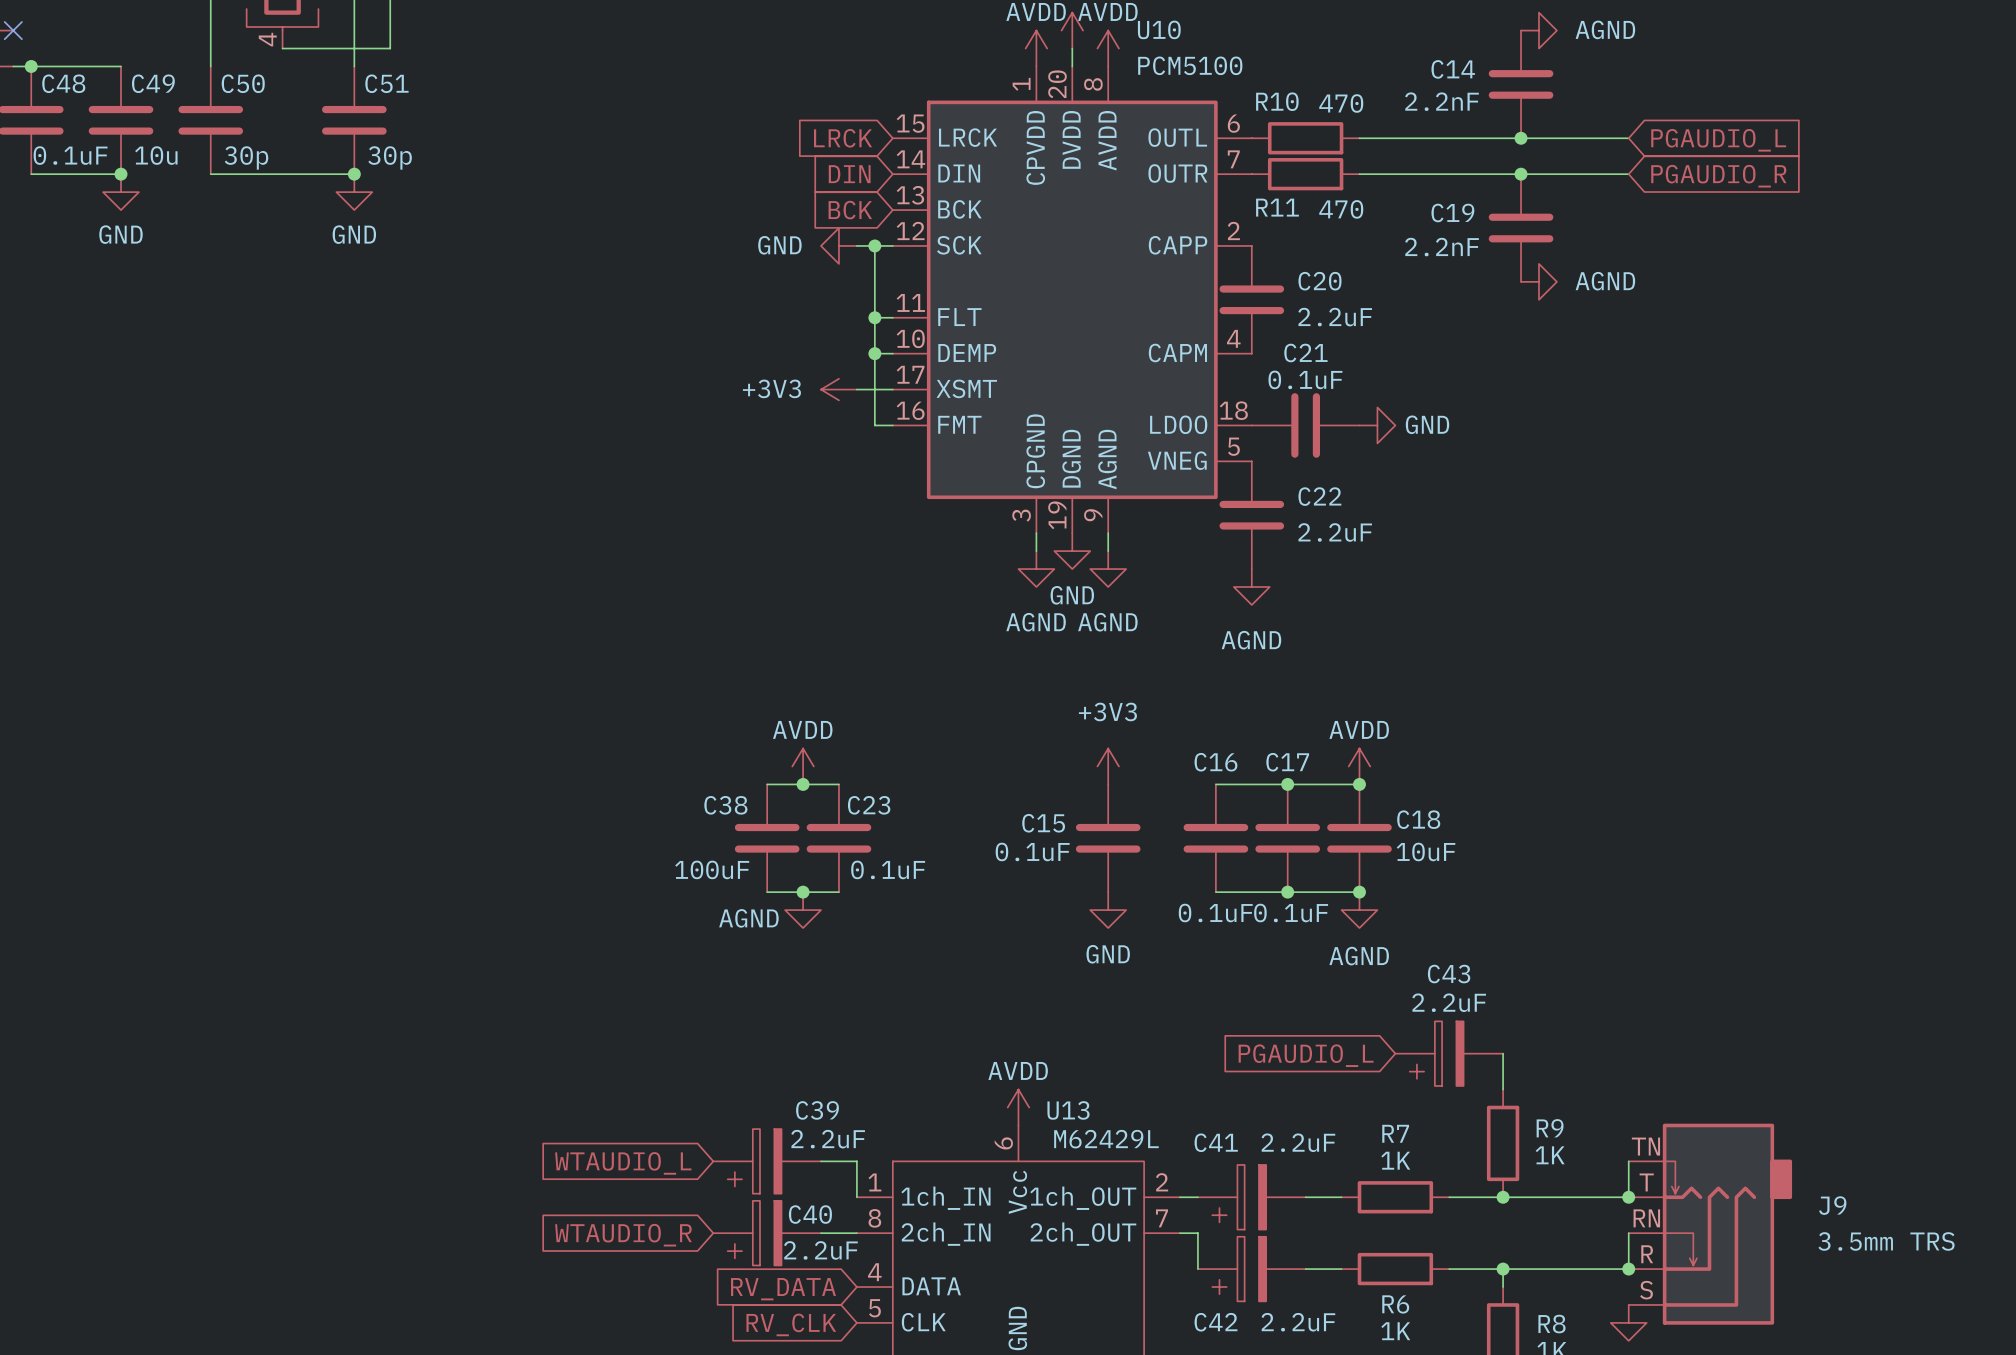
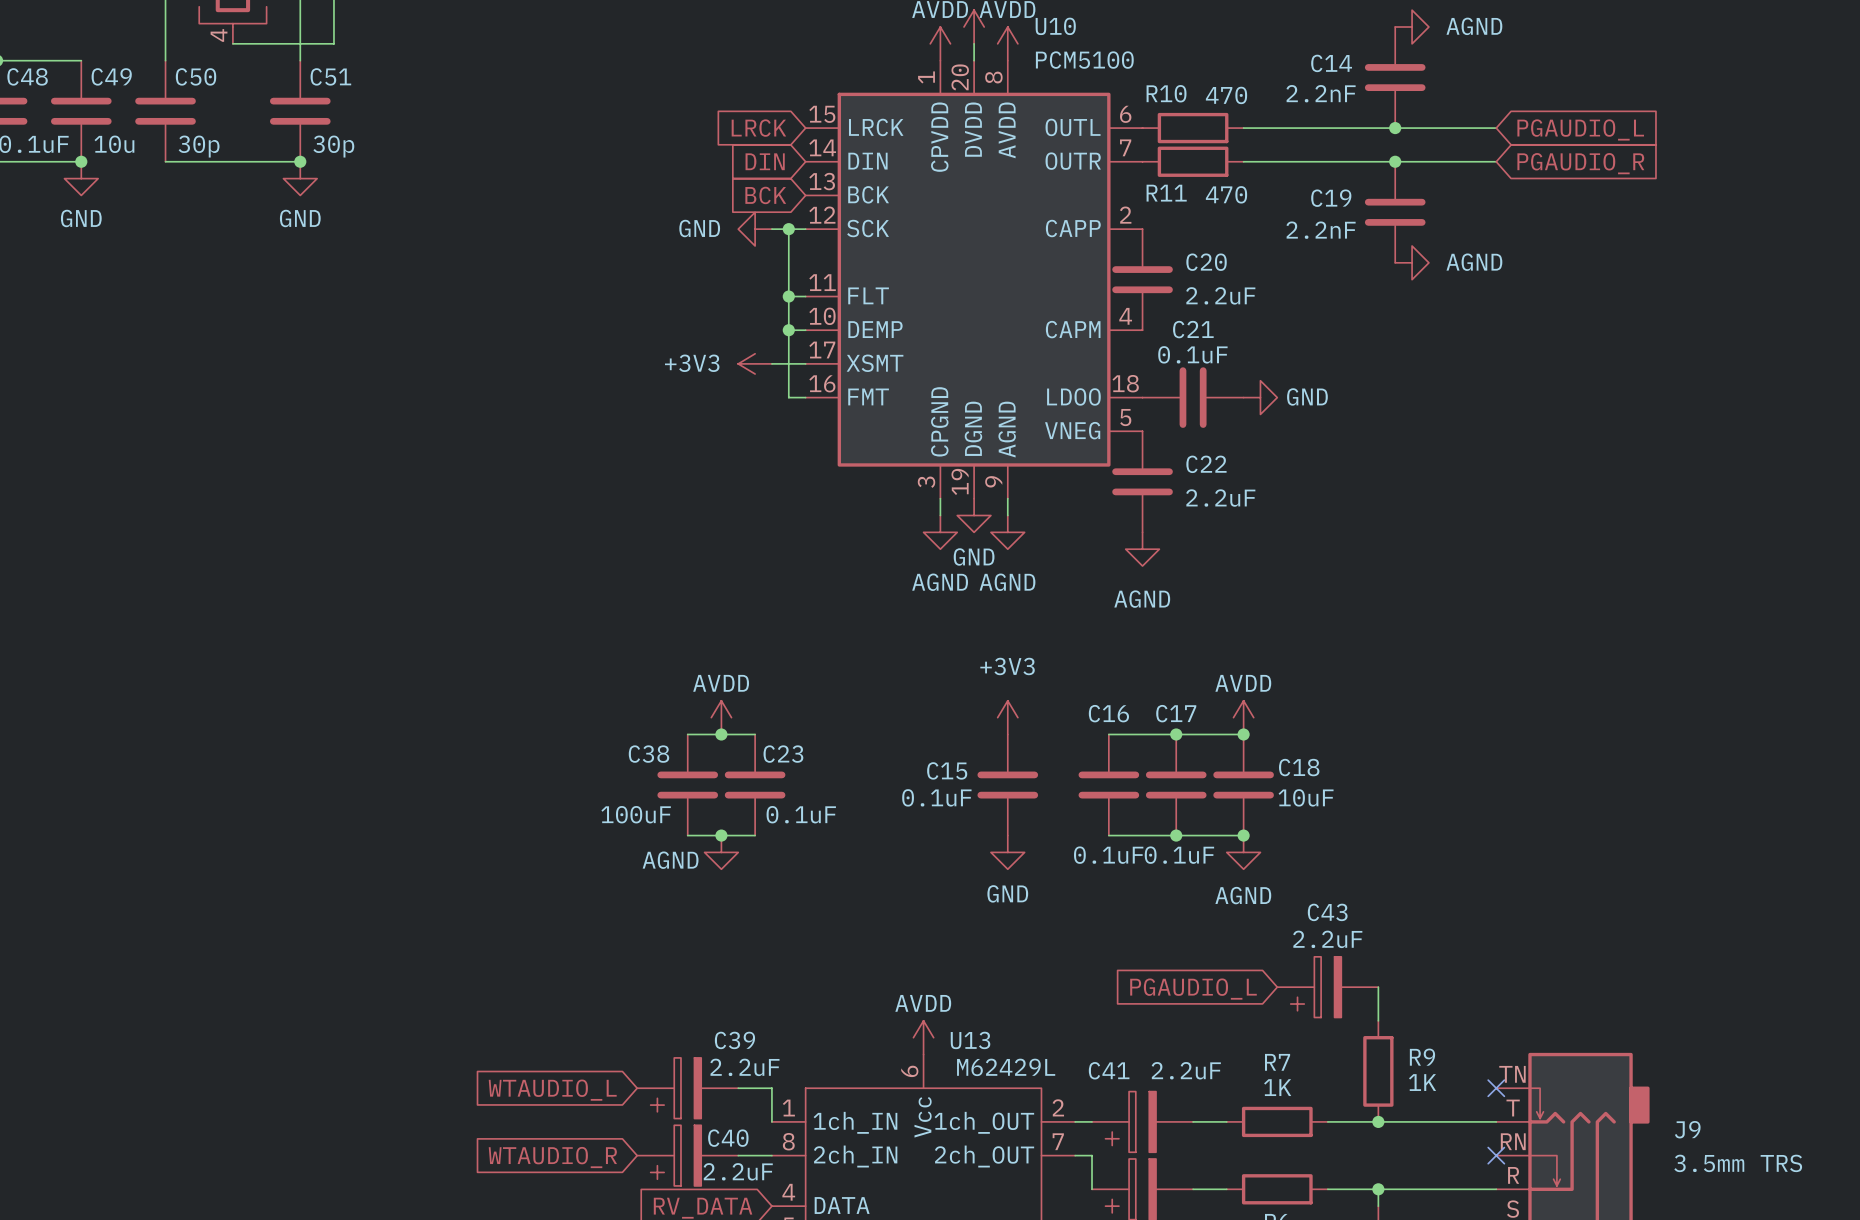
wire: (1628, 1161) (1628, 1197) -> none
no-connect mark: none -> (1496, 1088)
junction: (1628, 1197) -> none
wire: (1628, 1233) (1628, 1269) -> none
no-connect mark: none -> (1496, 1155)
junction: (1628, 1269) -> none

